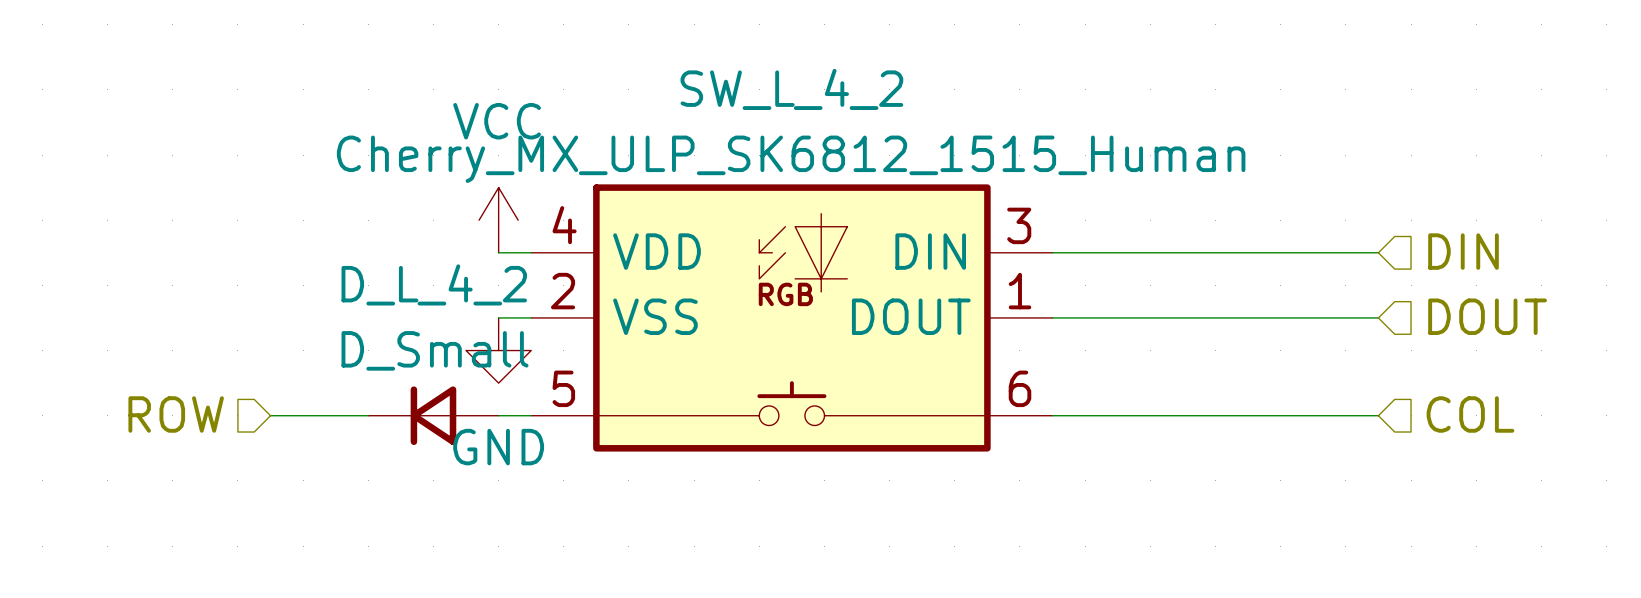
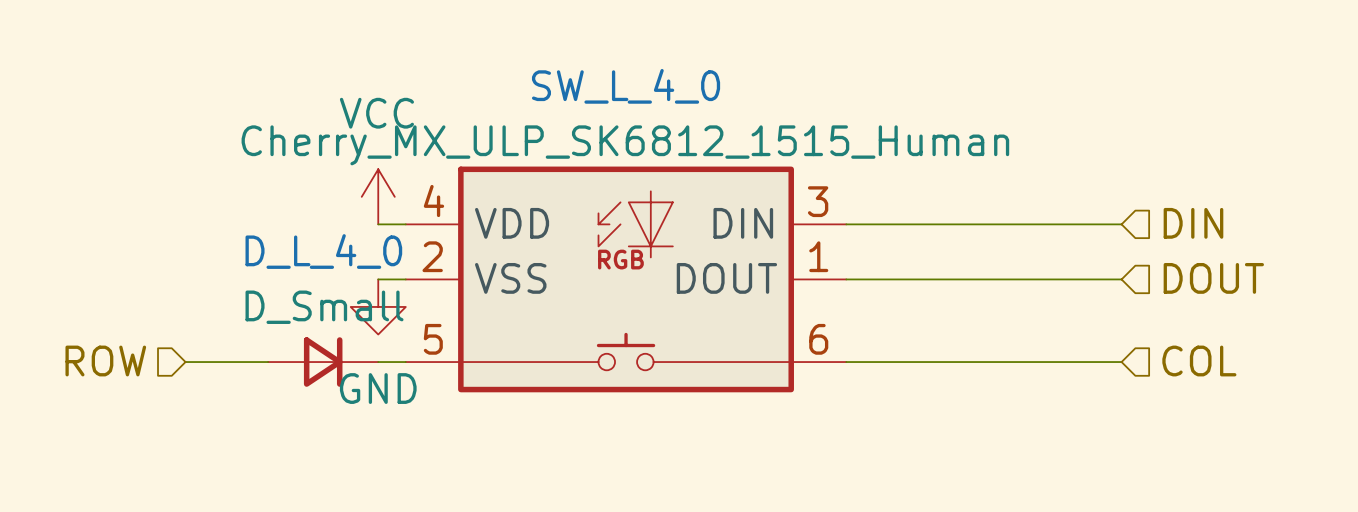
SW_L_4_2 name: SW_L_4_2 (791, 89) -> SW_L_4_0 (626, 86)
D_L_4_2: D_Small (433, 415) -> none
D_L_4_0: none -> D_Small (323, 362)

